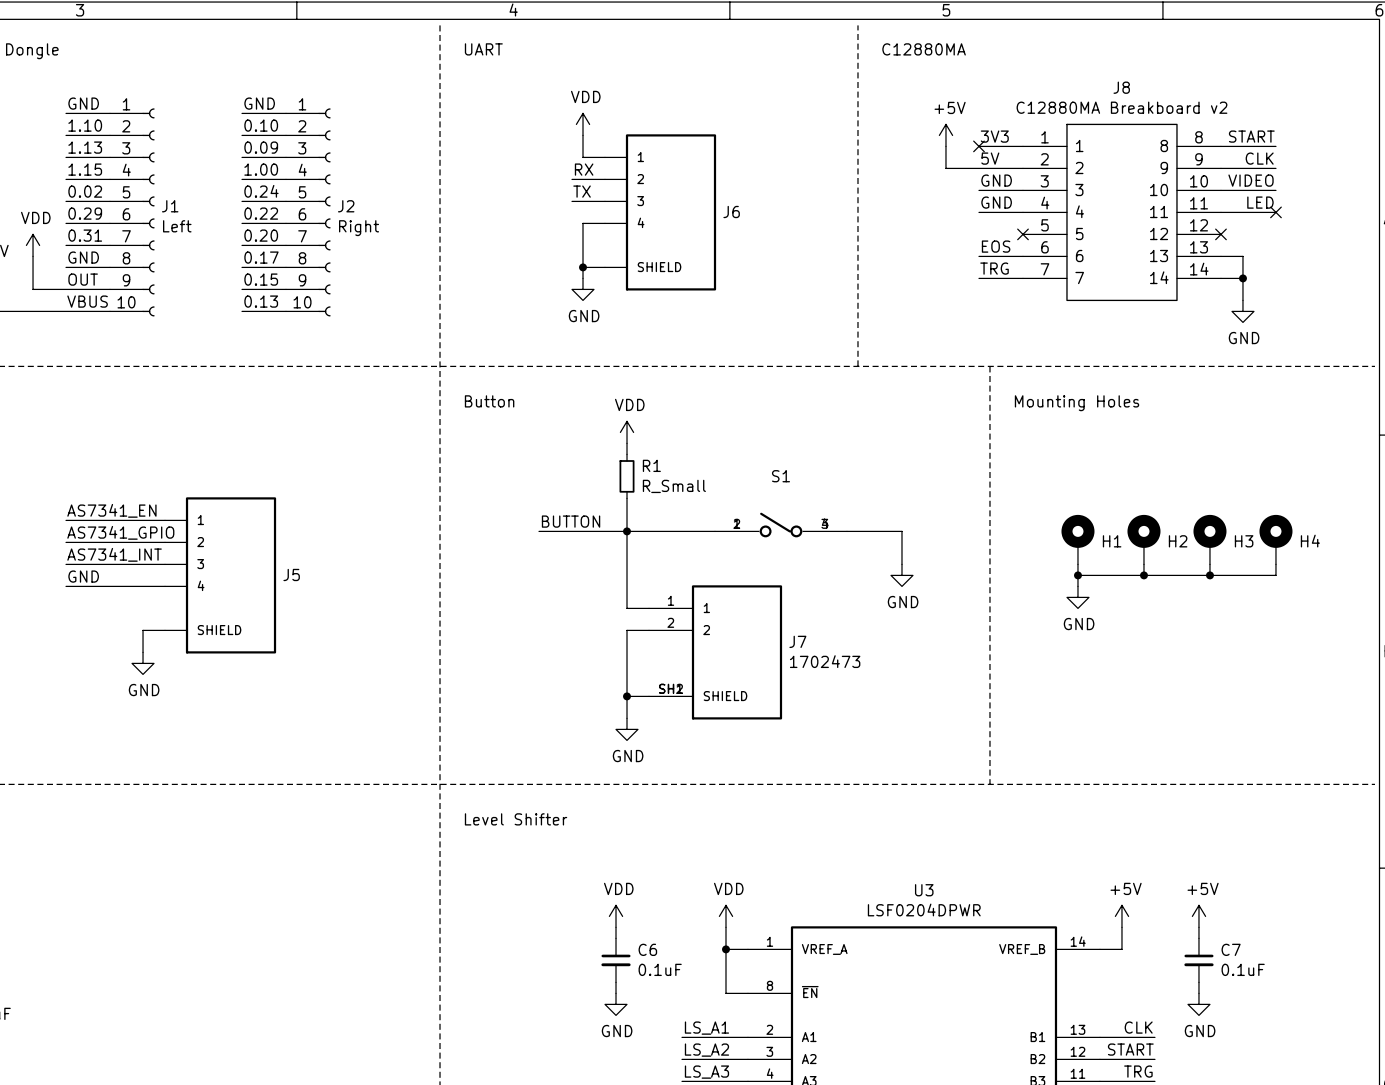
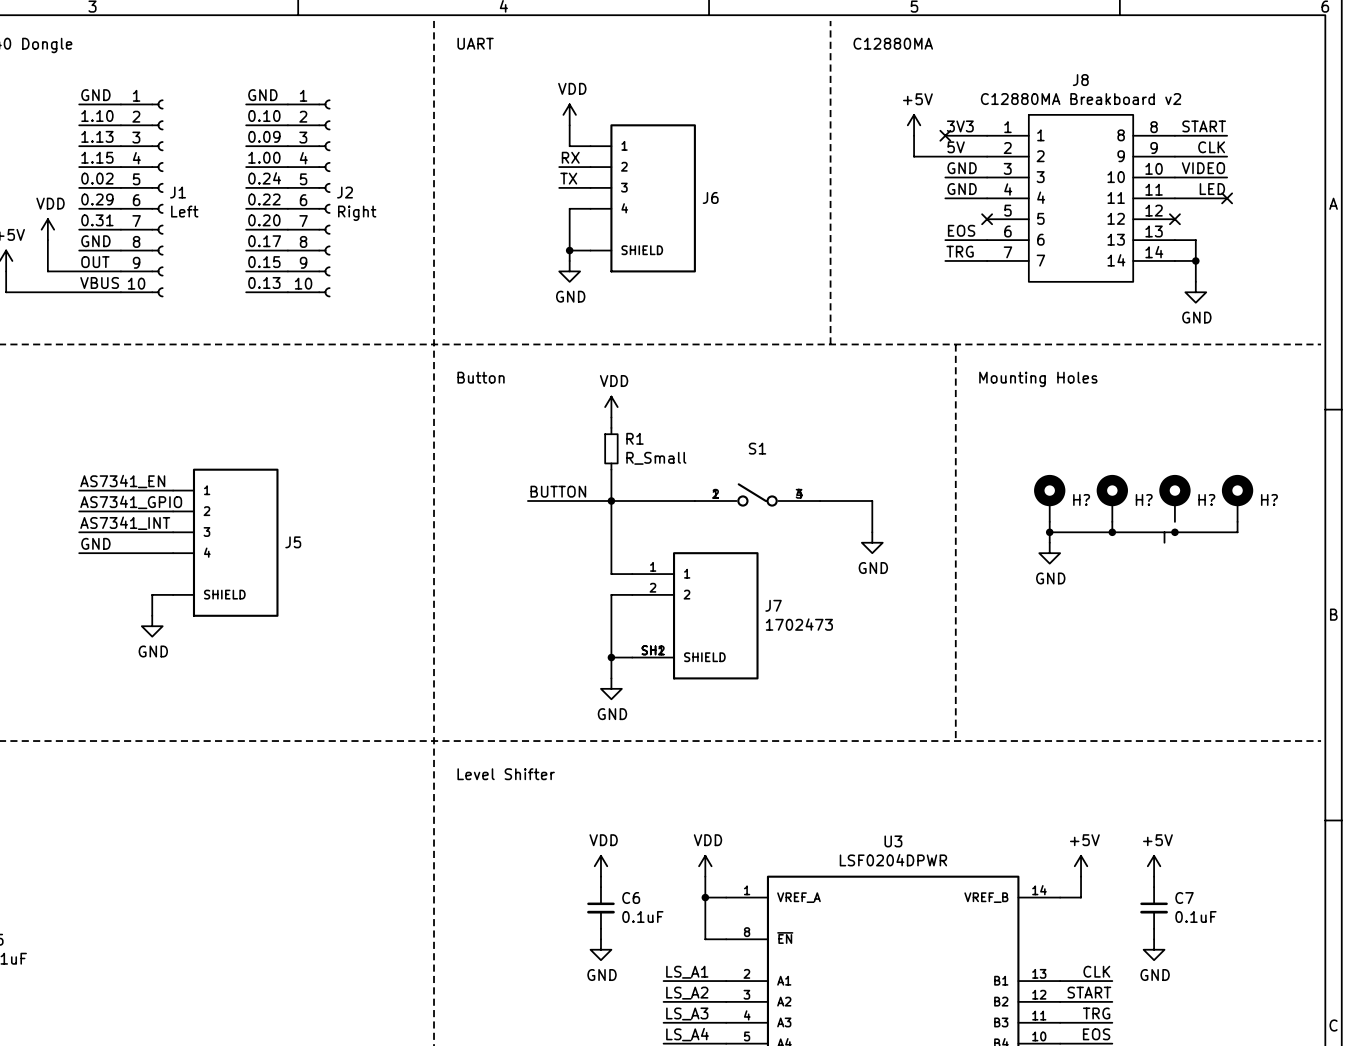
H?: none -> (1049, 498)
H?: none -> (1112, 498)
H?: none -> (1174, 498)
H?: none -> (1237, 498)
H1: (1077, 539) -> none
H2: (1143, 539) -> none
H3: (1209, 539) -> none
H4: (1275, 539) -> none
wire: (1077, 564) (1077, 586) -> (1049, 521) (1049, 542)
wire: (1143, 564) (1143, 575) -> (1112, 521) (1112, 532)
wire: (1275, 564) (1275, 575) (1077, 575) -> (1237, 521) (1237, 532) (1049, 532)
junction position: (1077, 575) -> (1049, 532)
junction position: (1143, 575) -> (1112, 532)
junction position: (1209, 575) -> (1174, 532)
power symbol position: GND (1077, 597) -> GND (1049, 553)

